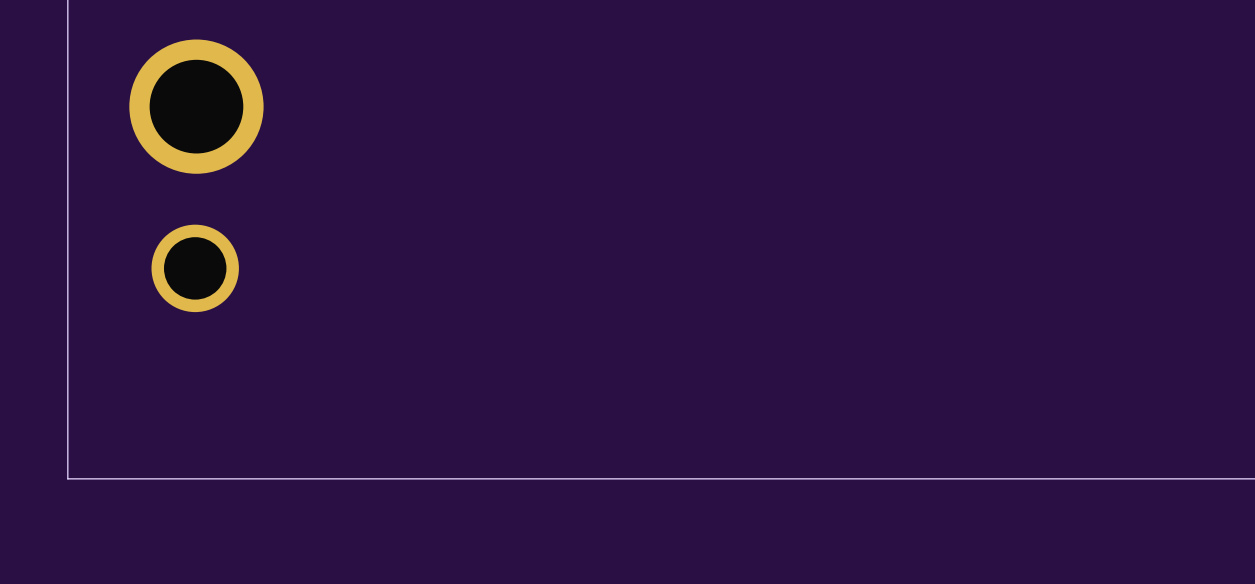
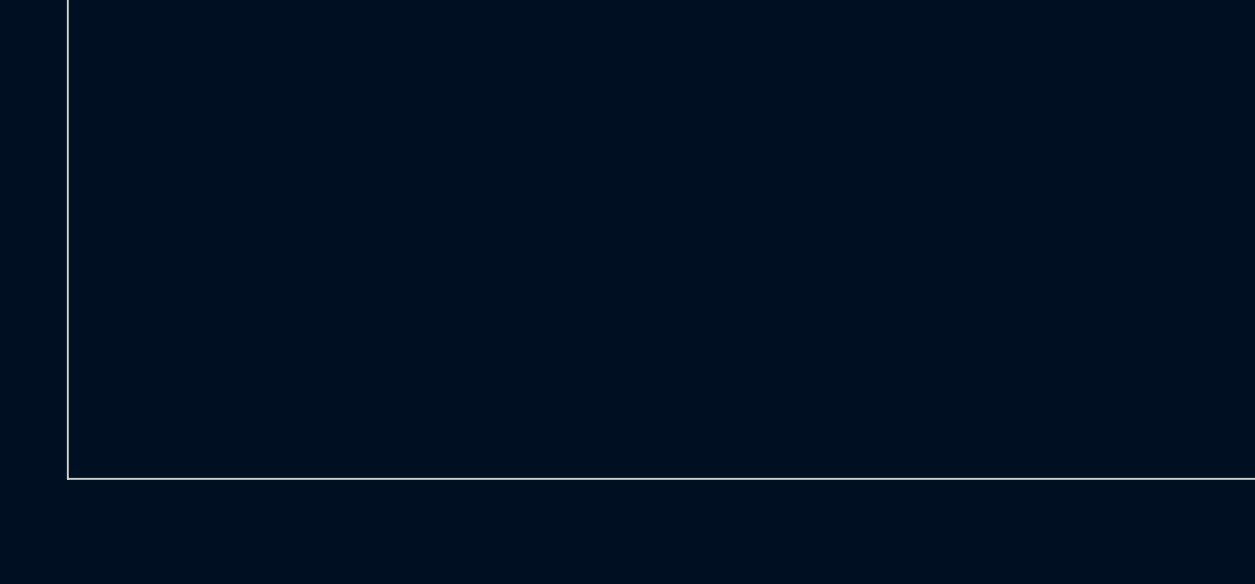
part: (196, 106) -> none
part: (195, 268) -> none

